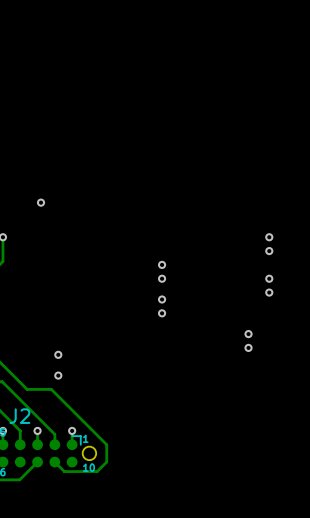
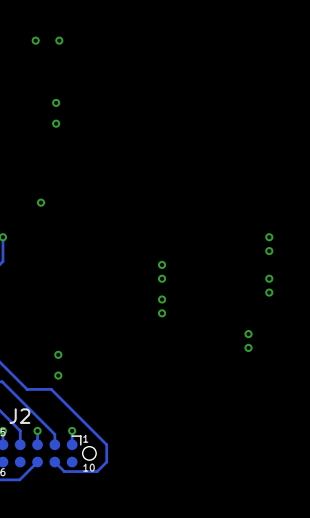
via: none -> (35, 40)
via: none -> (59, 40)
via: none -> (56, 102)
via: none -> (56, 123)

